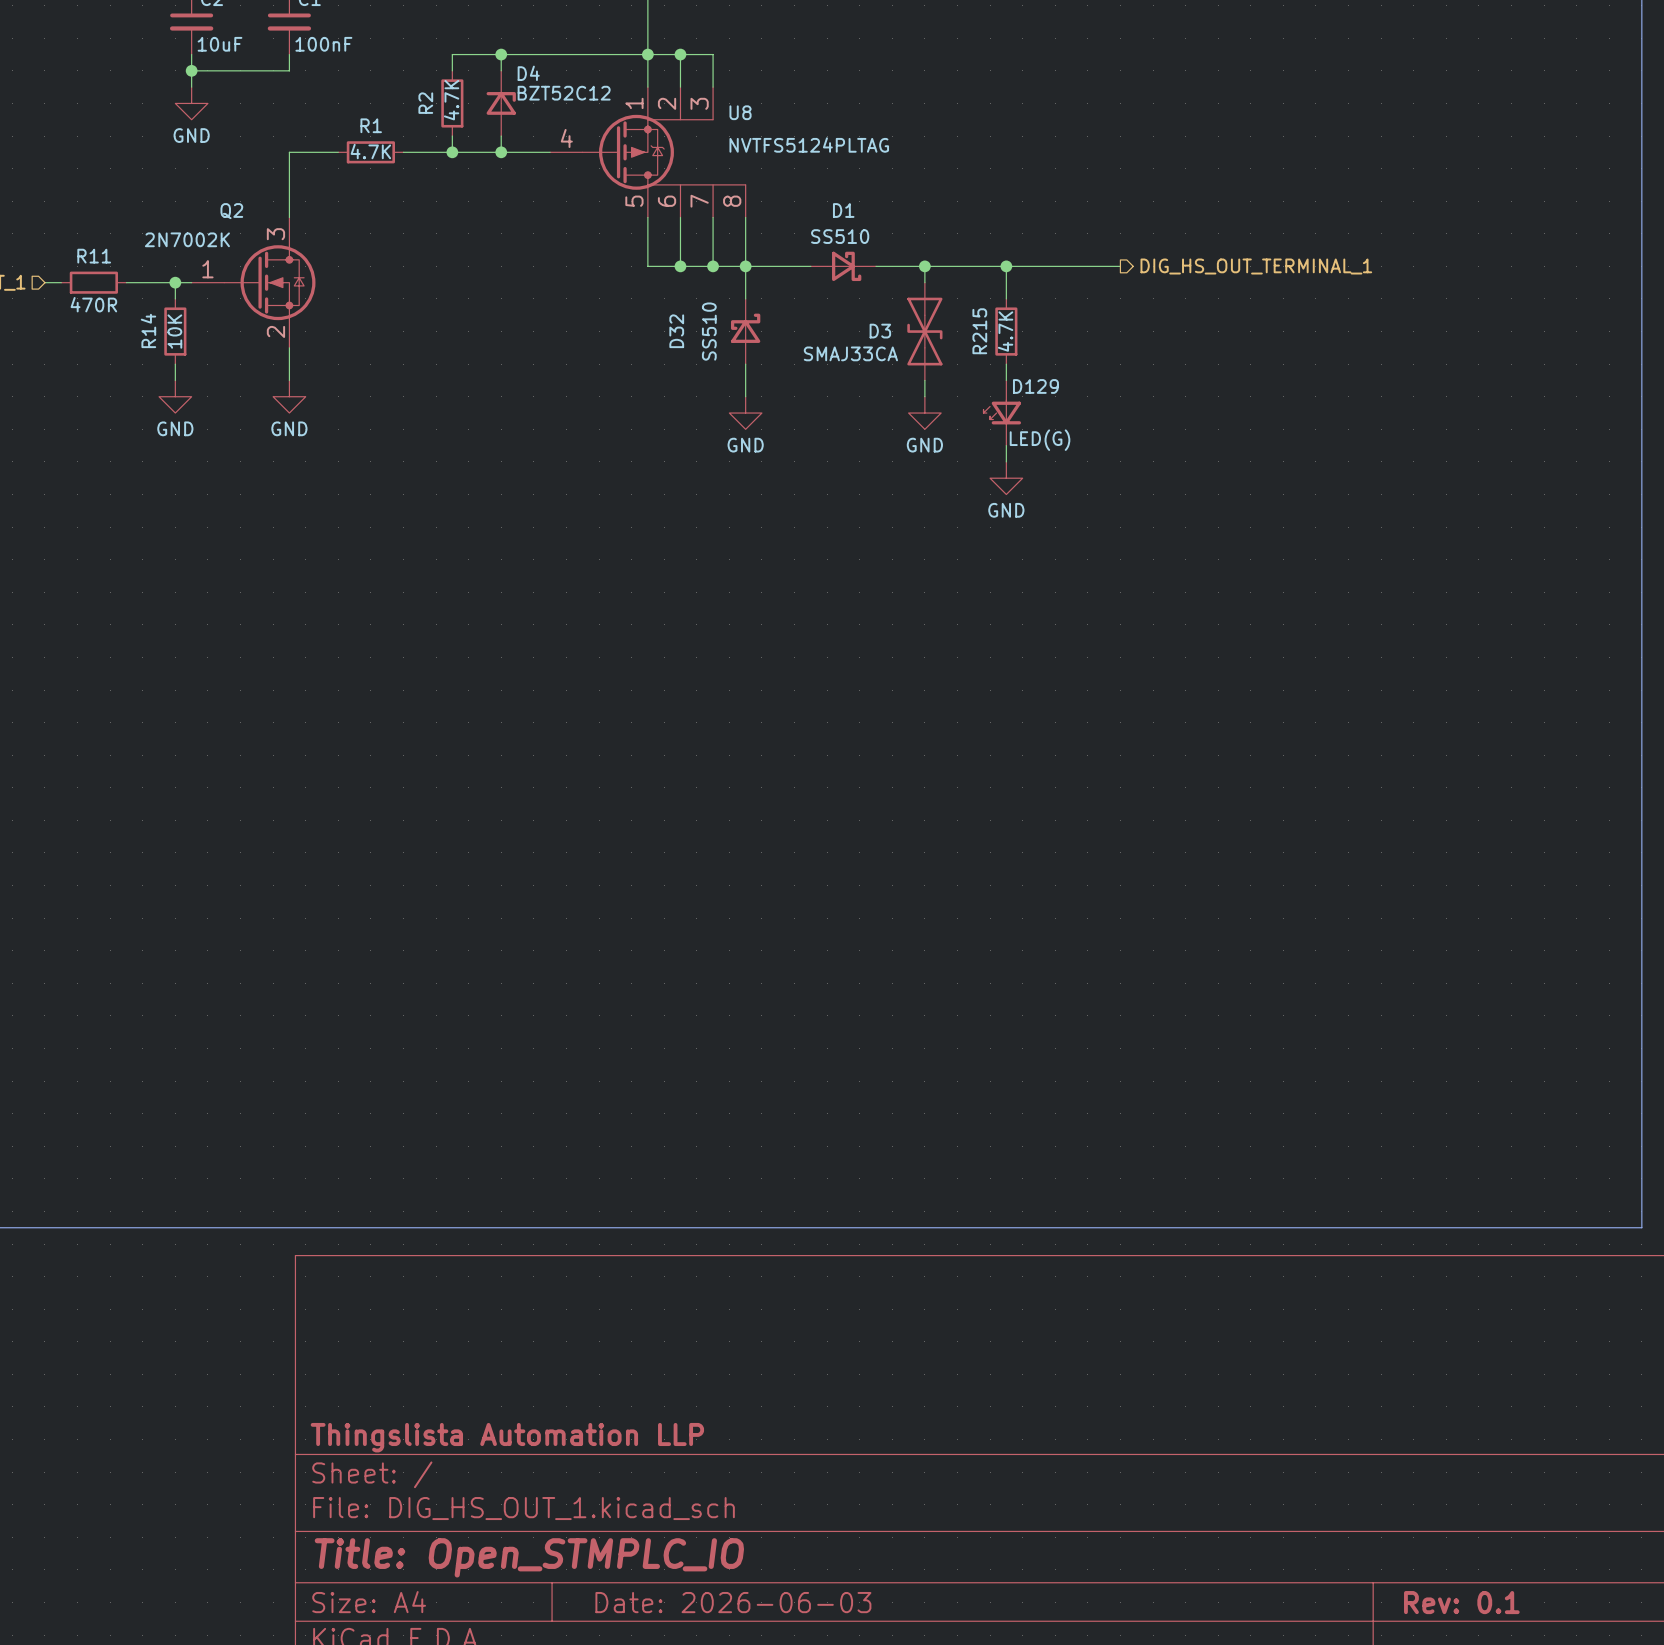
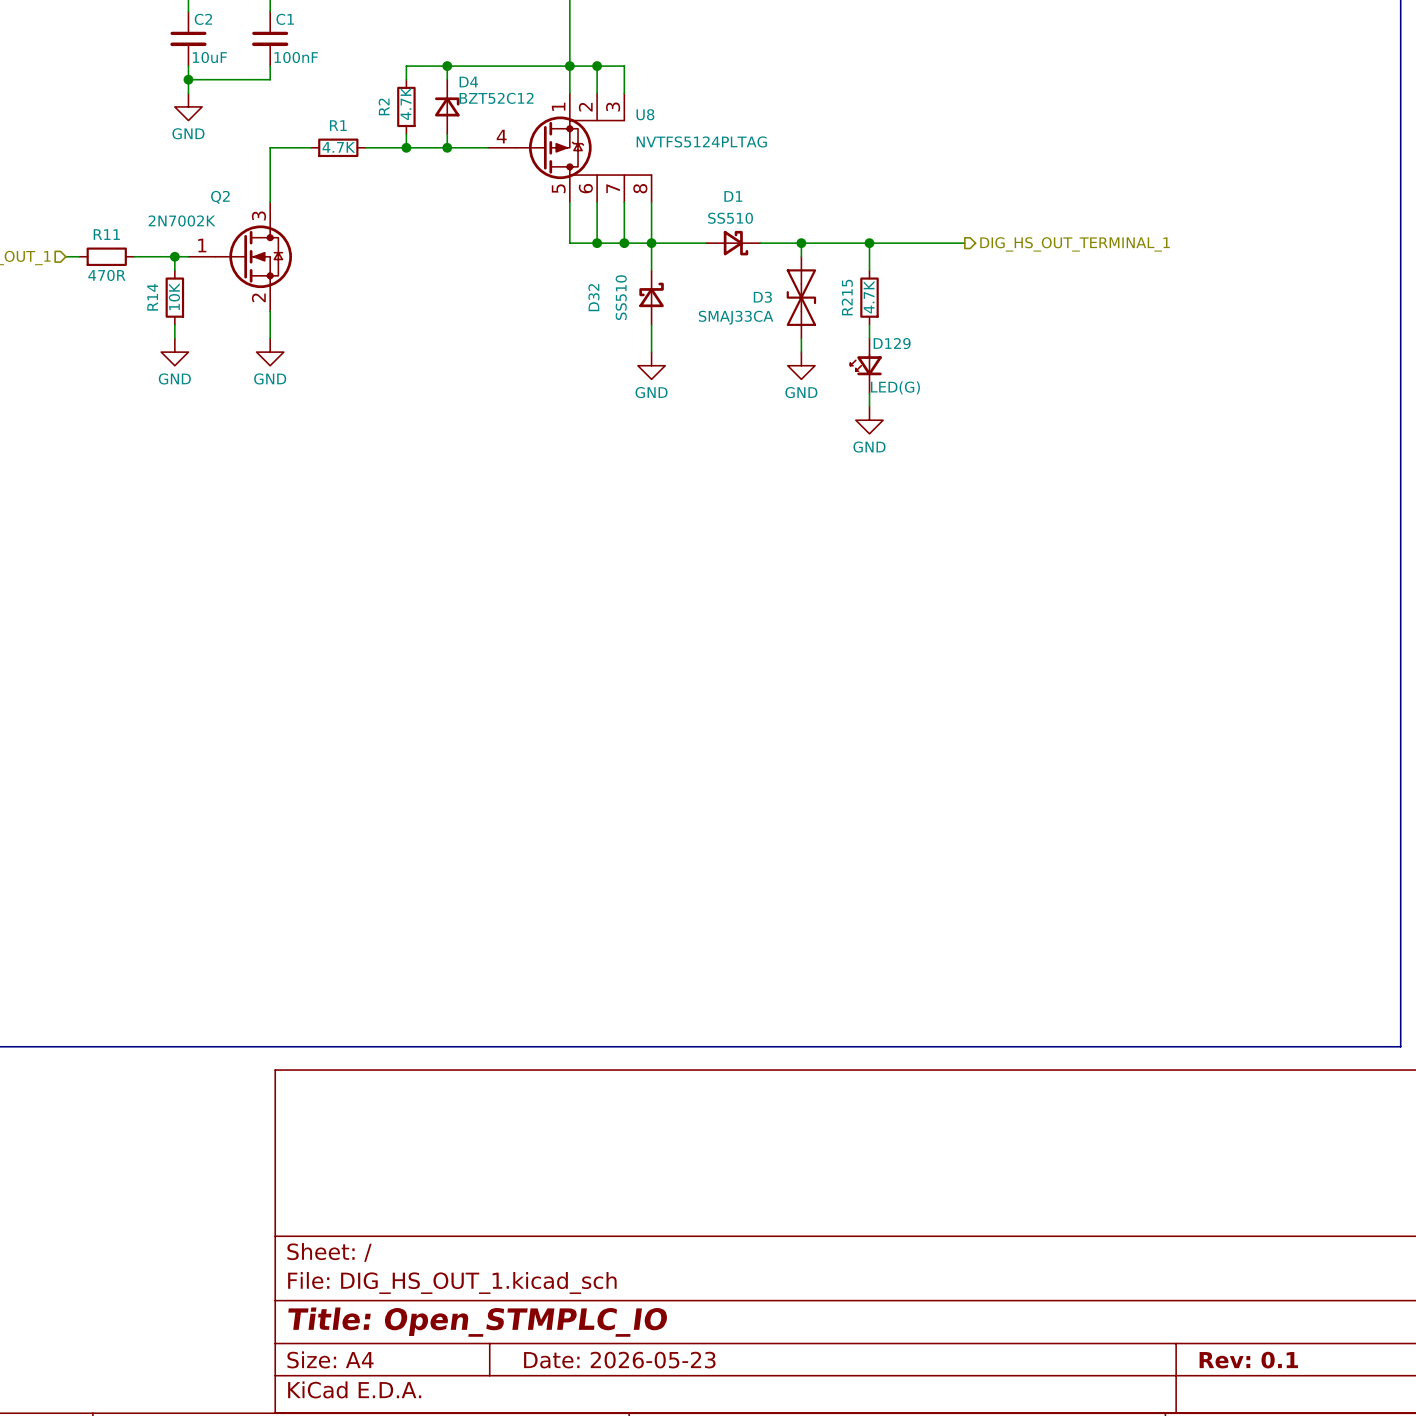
title block: Thingslista Automation LLP (507, 1437) -> none
title block: Date: 2026-06-03 (733, 1602) -> Date: 2026-05-23 (619, 1360)

